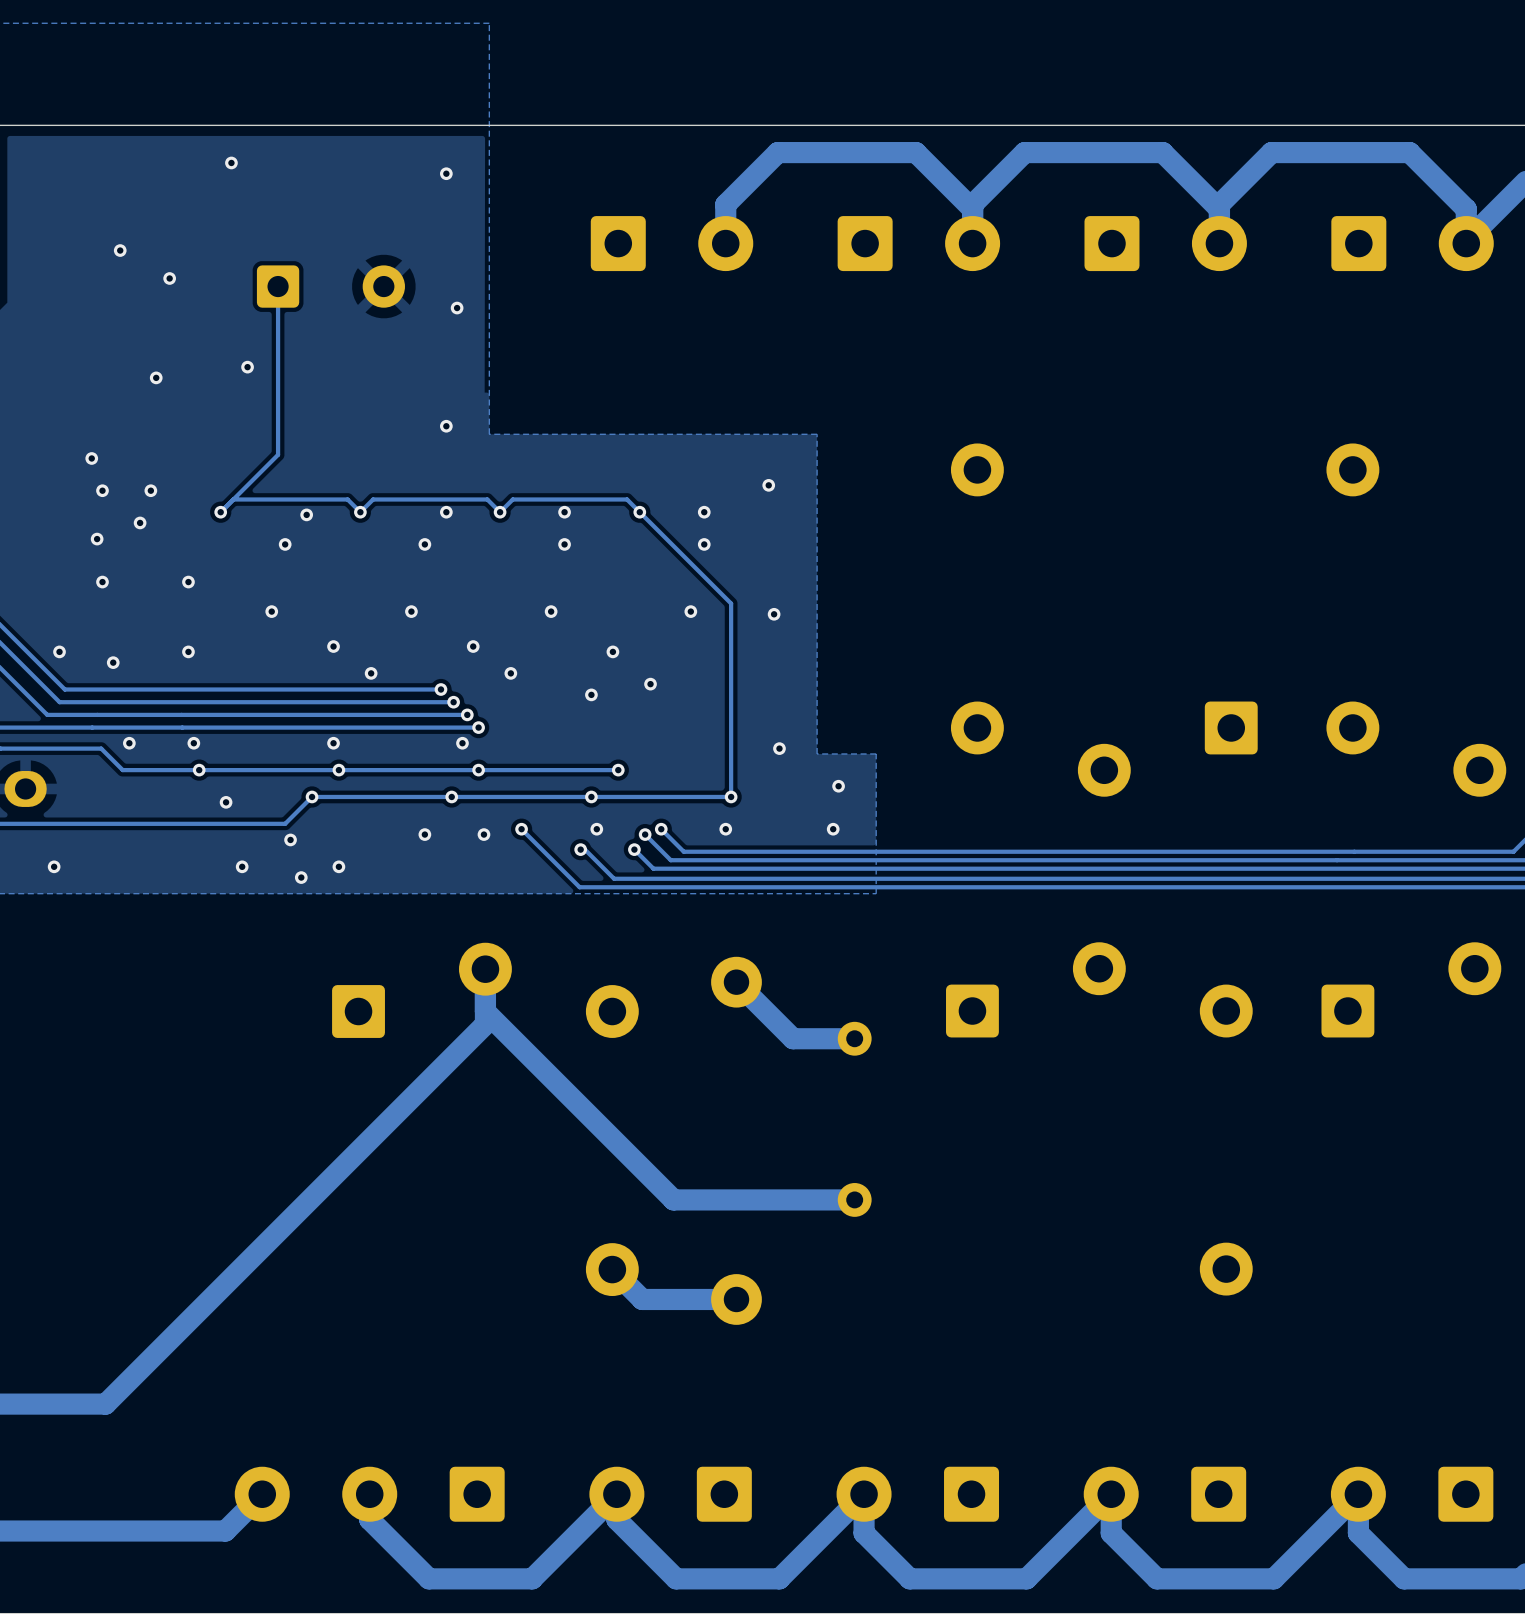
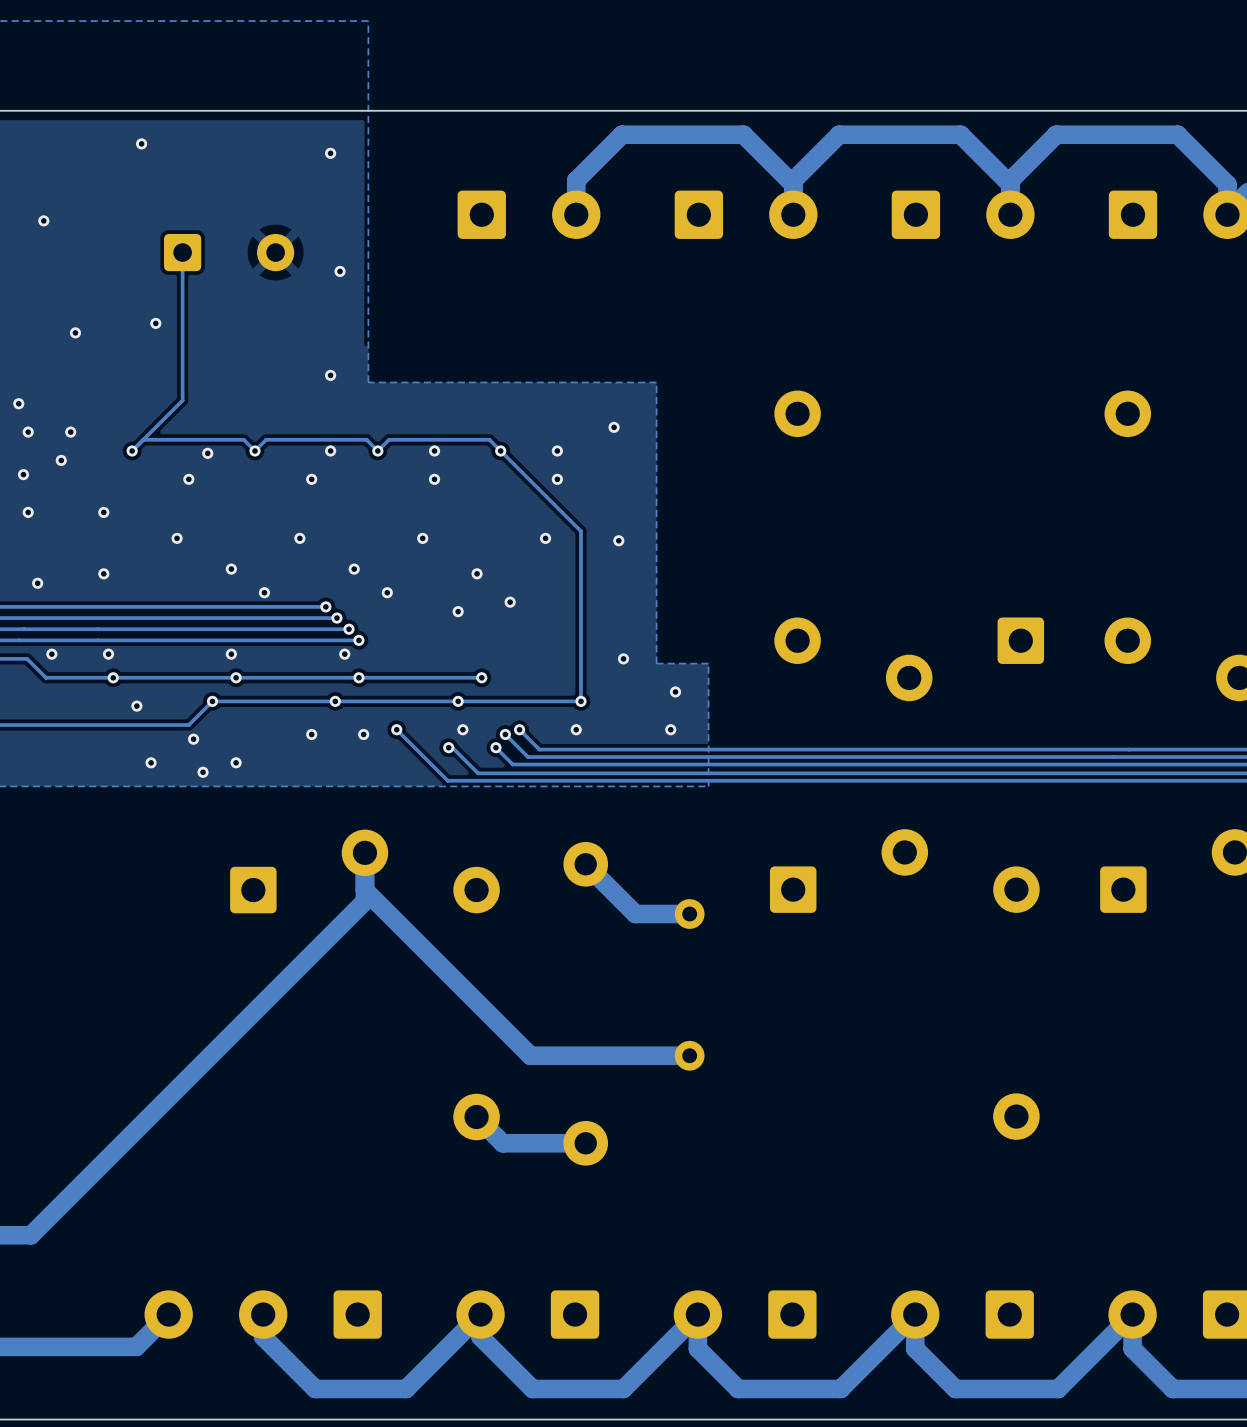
via: (169, 278) -> none

